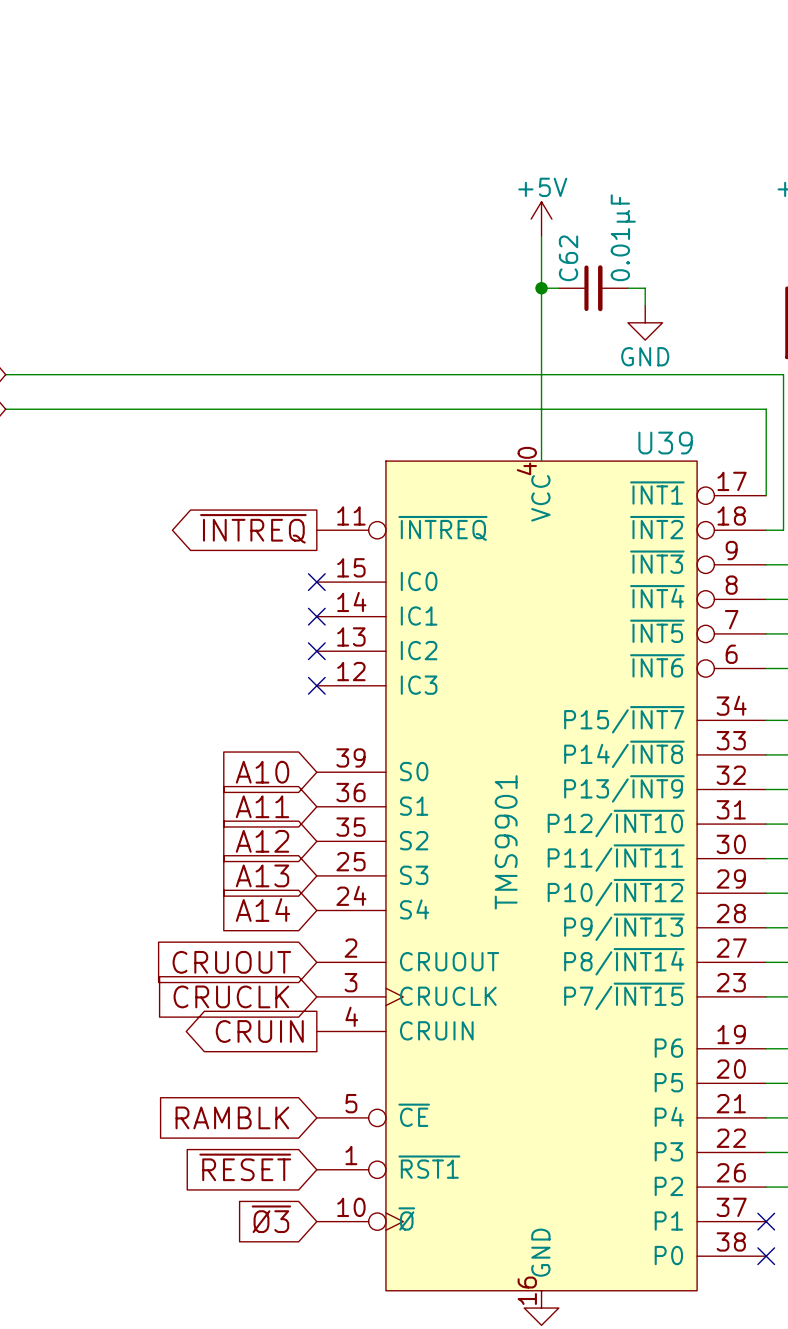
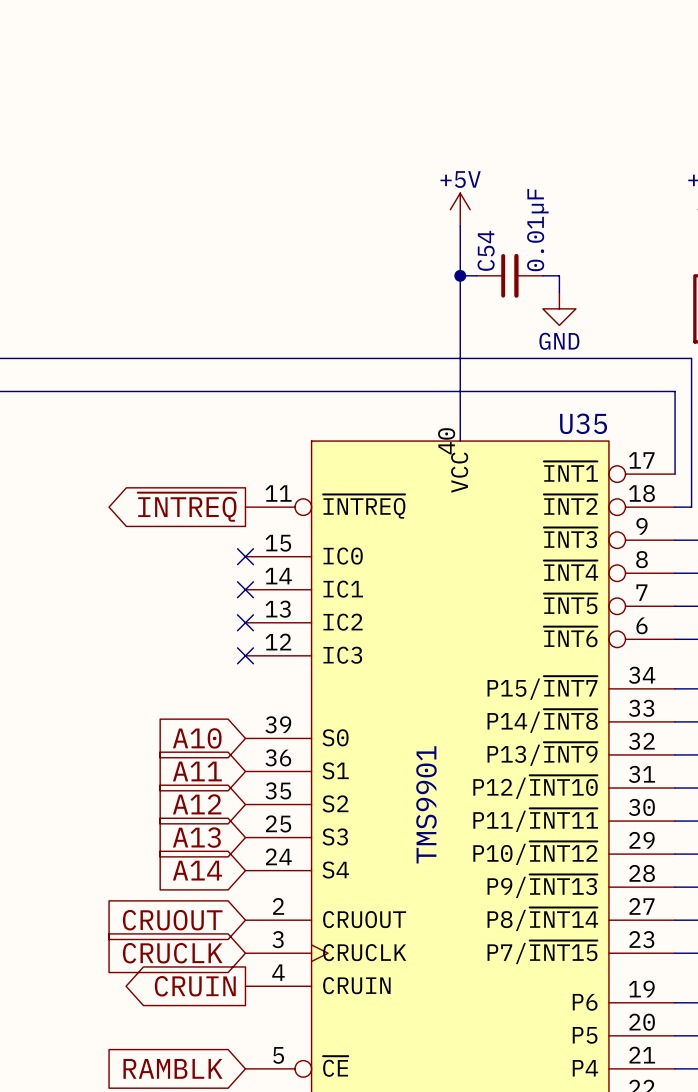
C62 name: C62 (568, 258) -> C54 (486, 250)
U39 name: U39 (665, 443) -> U35 (583, 423)

